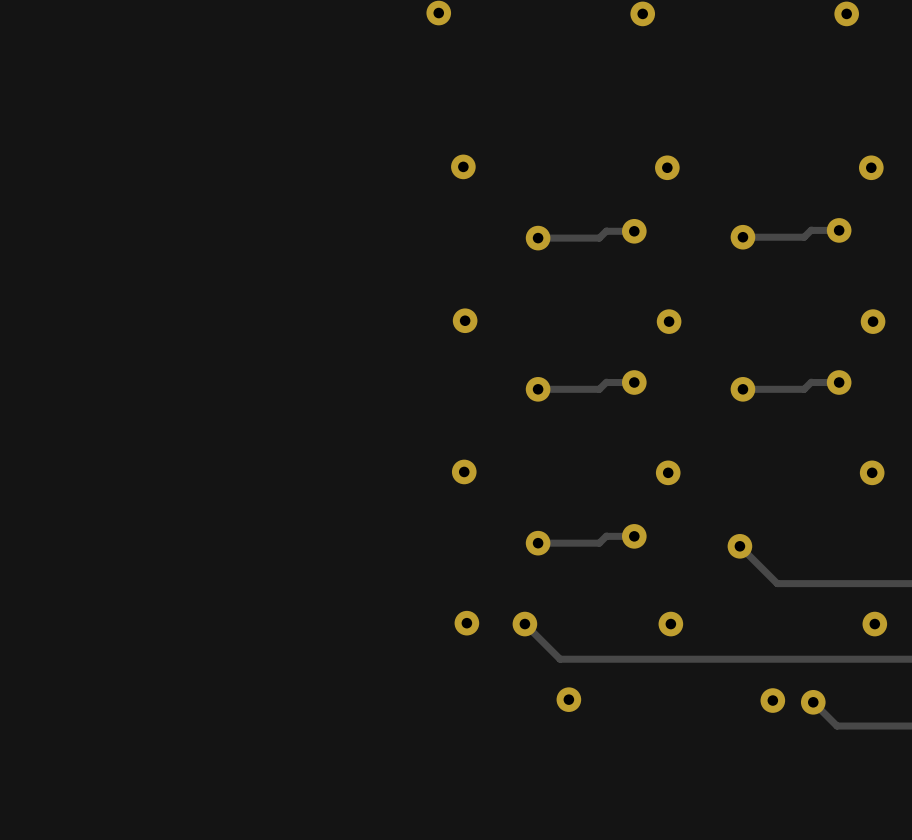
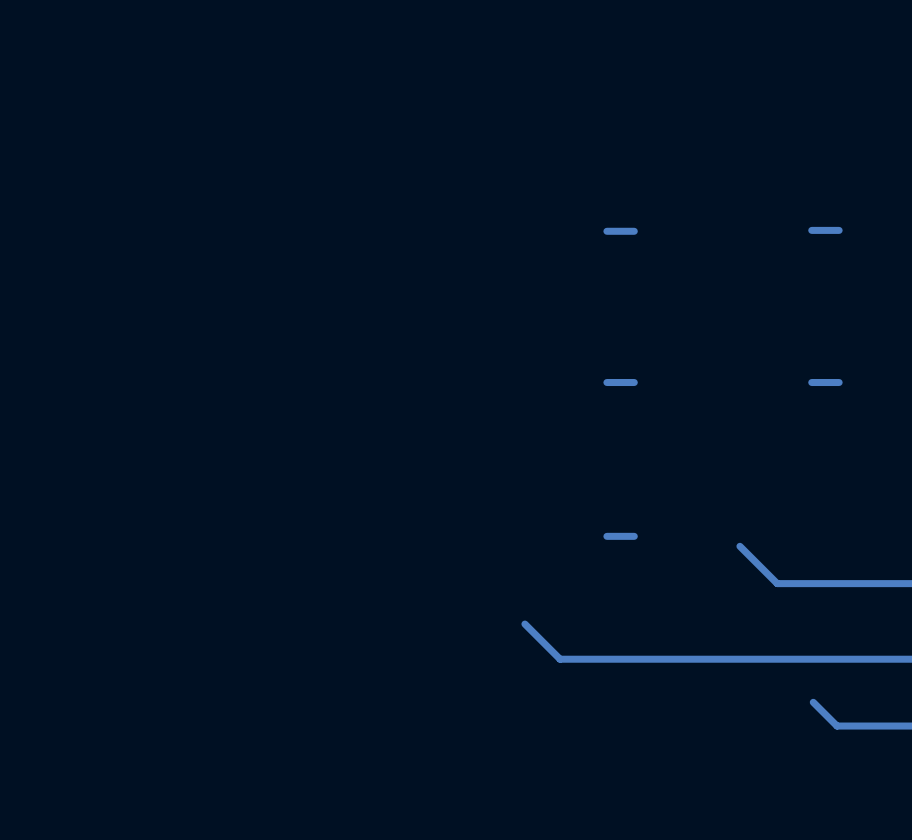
via: (438, 13) -> none
via: (642, 13) -> none
via: (846, 13) -> none
via: (463, 166) -> none
via: (667, 167) -> none
via: (871, 167) -> none
track: (606, 230) (599, 238) (538, 238) -> none
track: (811, 230) (804, 237) (742, 237) -> none
via: (839, 230) -> none
via: (634, 231) -> none
via: (742, 237) -> none
via: (538, 238) -> none
via: (465, 320) -> none
via: (669, 321) -> none
via: (873, 321) -> none
track: (606, 382) (599, 389) (538, 389) -> none
via: (634, 382) -> none
track: (811, 382) (804, 389) (742, 389) -> none
via: (839, 382) -> none
via: (538, 389) -> none
via: (742, 389) -> none
via: (464, 471) -> none
via: (668, 472) -> none
via: (872, 472) -> none
track: (606, 535) (599, 543) (538, 543) -> none
via: (634, 536) -> none
via: (538, 543) -> none
via: (739, 546) -> none
via: (466, 623) -> none
via: (524, 624) -> none
via: (670, 624) -> none
via: (874, 624) -> none
via: (568, 699) -> none
via: (772, 700) -> none
via: (813, 702) -> none

